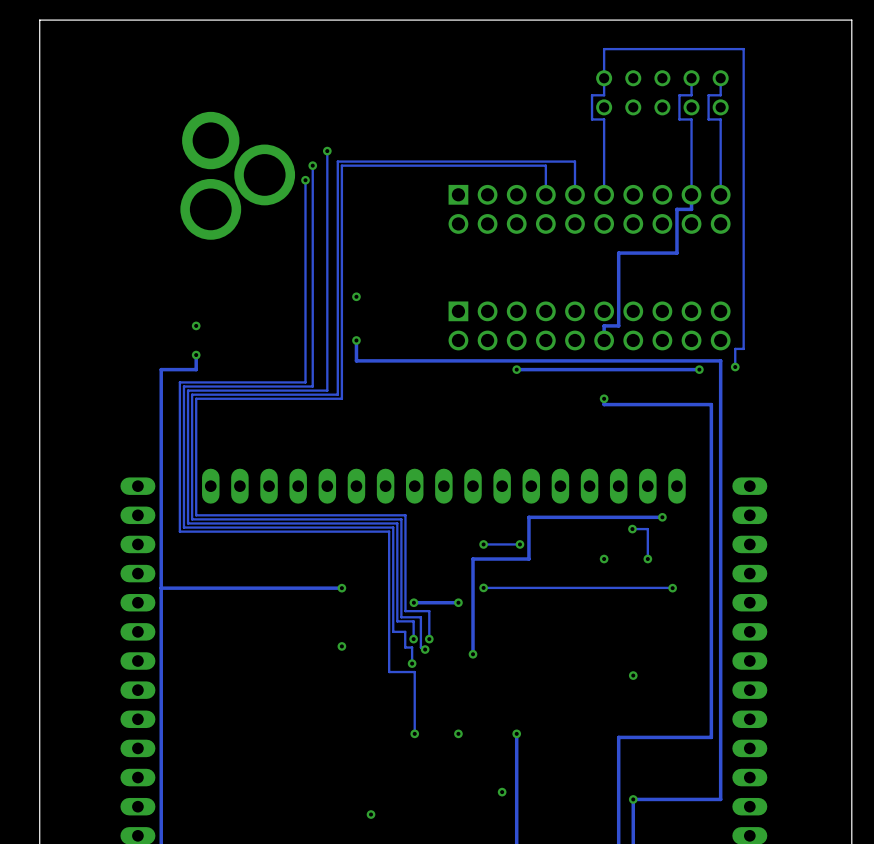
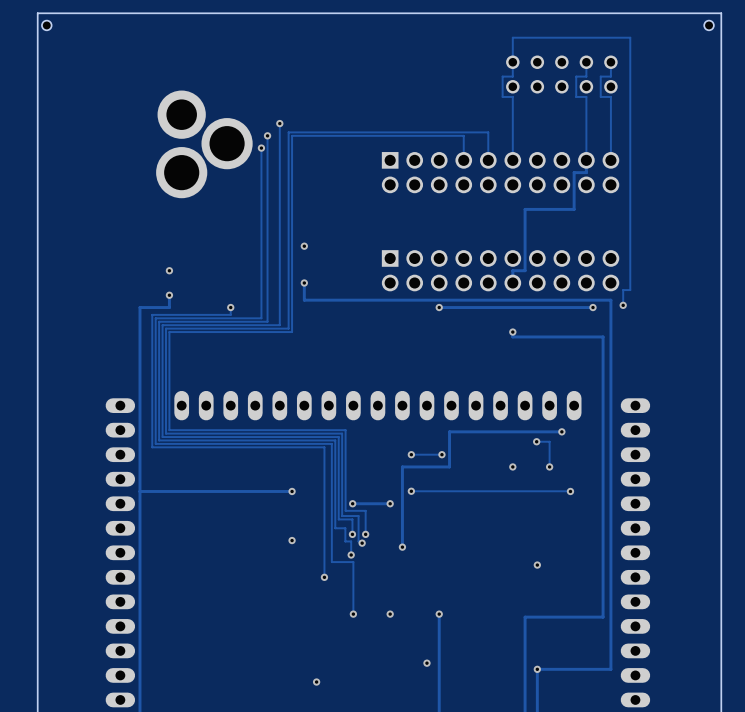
hole: none -> (46, 25)
hole: none -> (709, 25)
track: none -> (230, 307) (230, 314) (152, 314) (152, 447) (324, 447) (324, 577)
via: none -> (230, 307)
via: none -> (324, 577)

